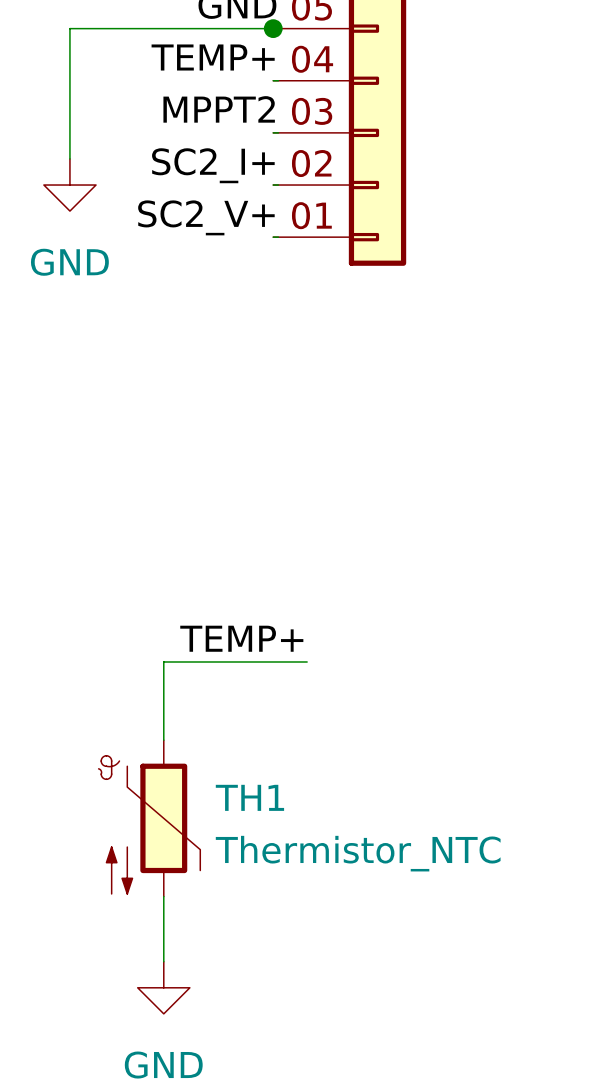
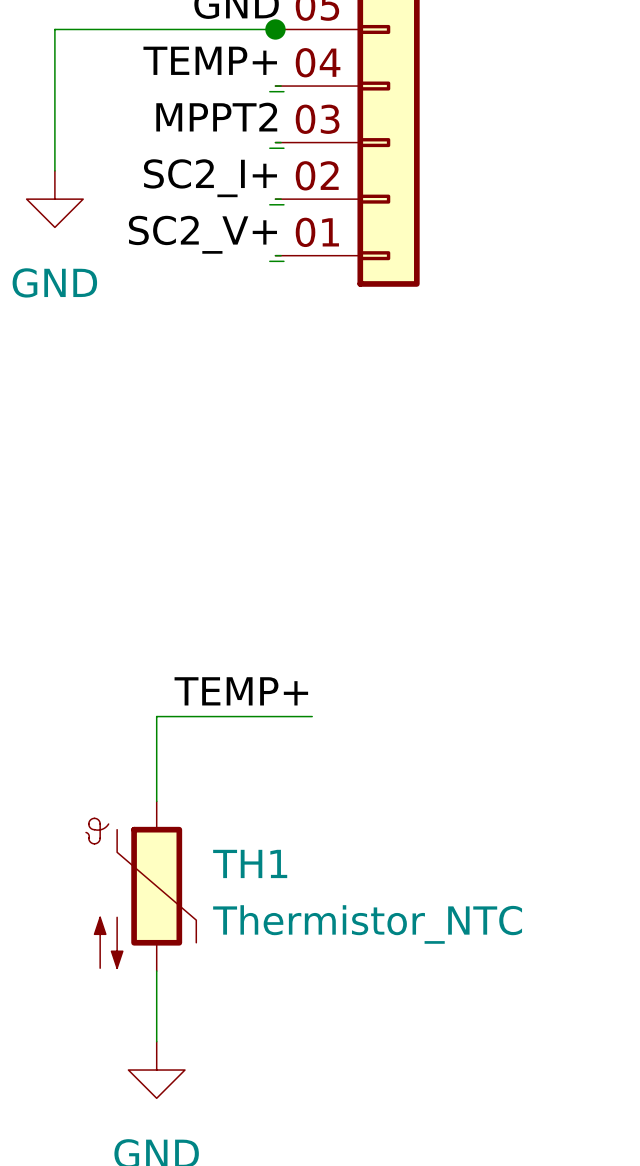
wire: none -> (269, 91) (283, 91)
wire: none -> (269, 148) (283, 148)
wire: none -> (269, 204) (283, 204)
wire: none -> (269, 261) (283, 261)

